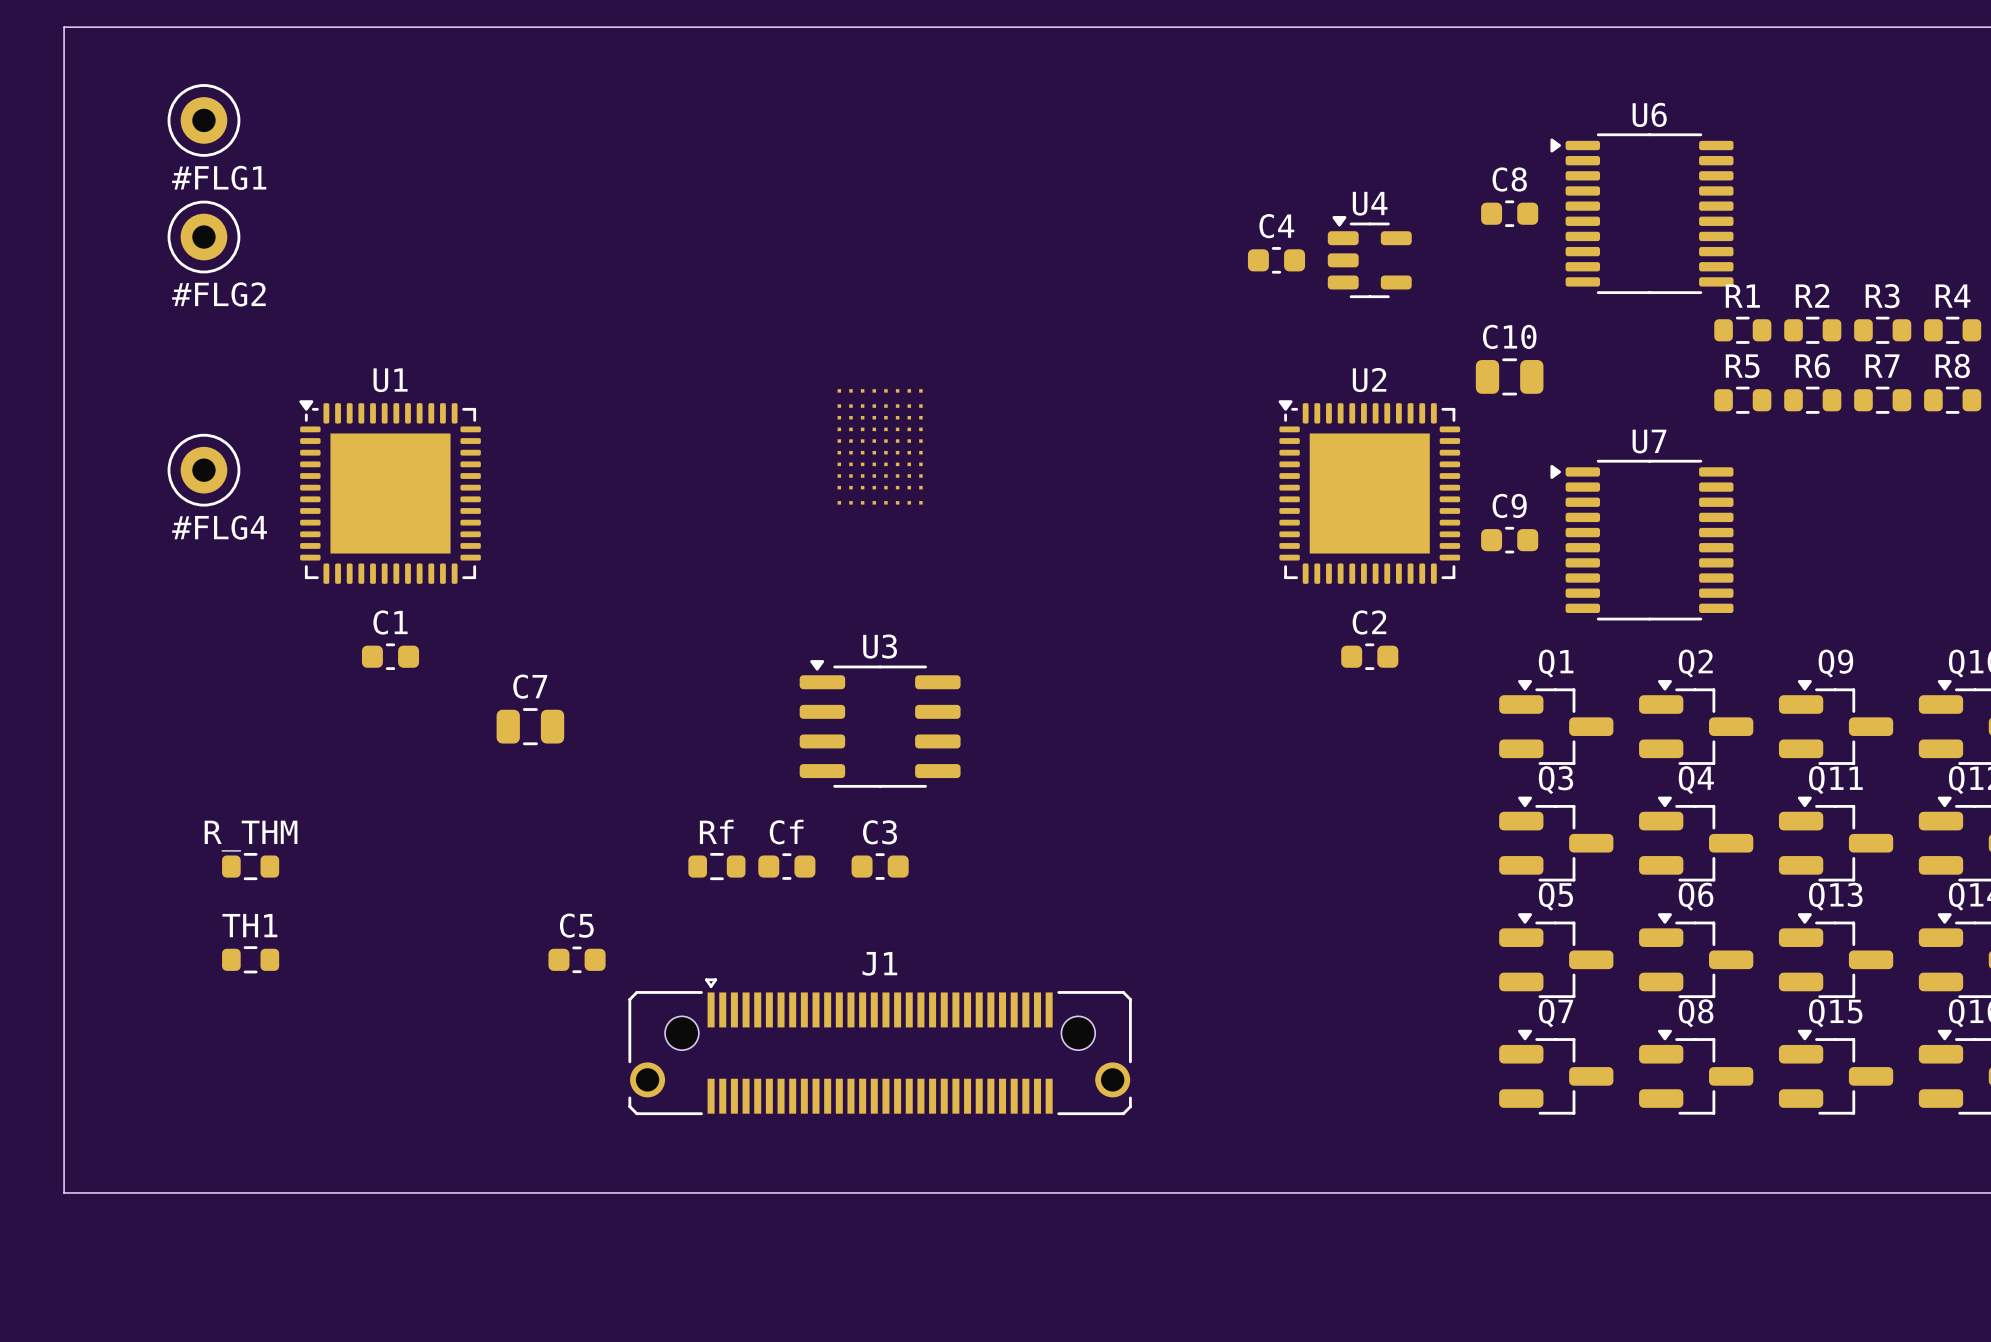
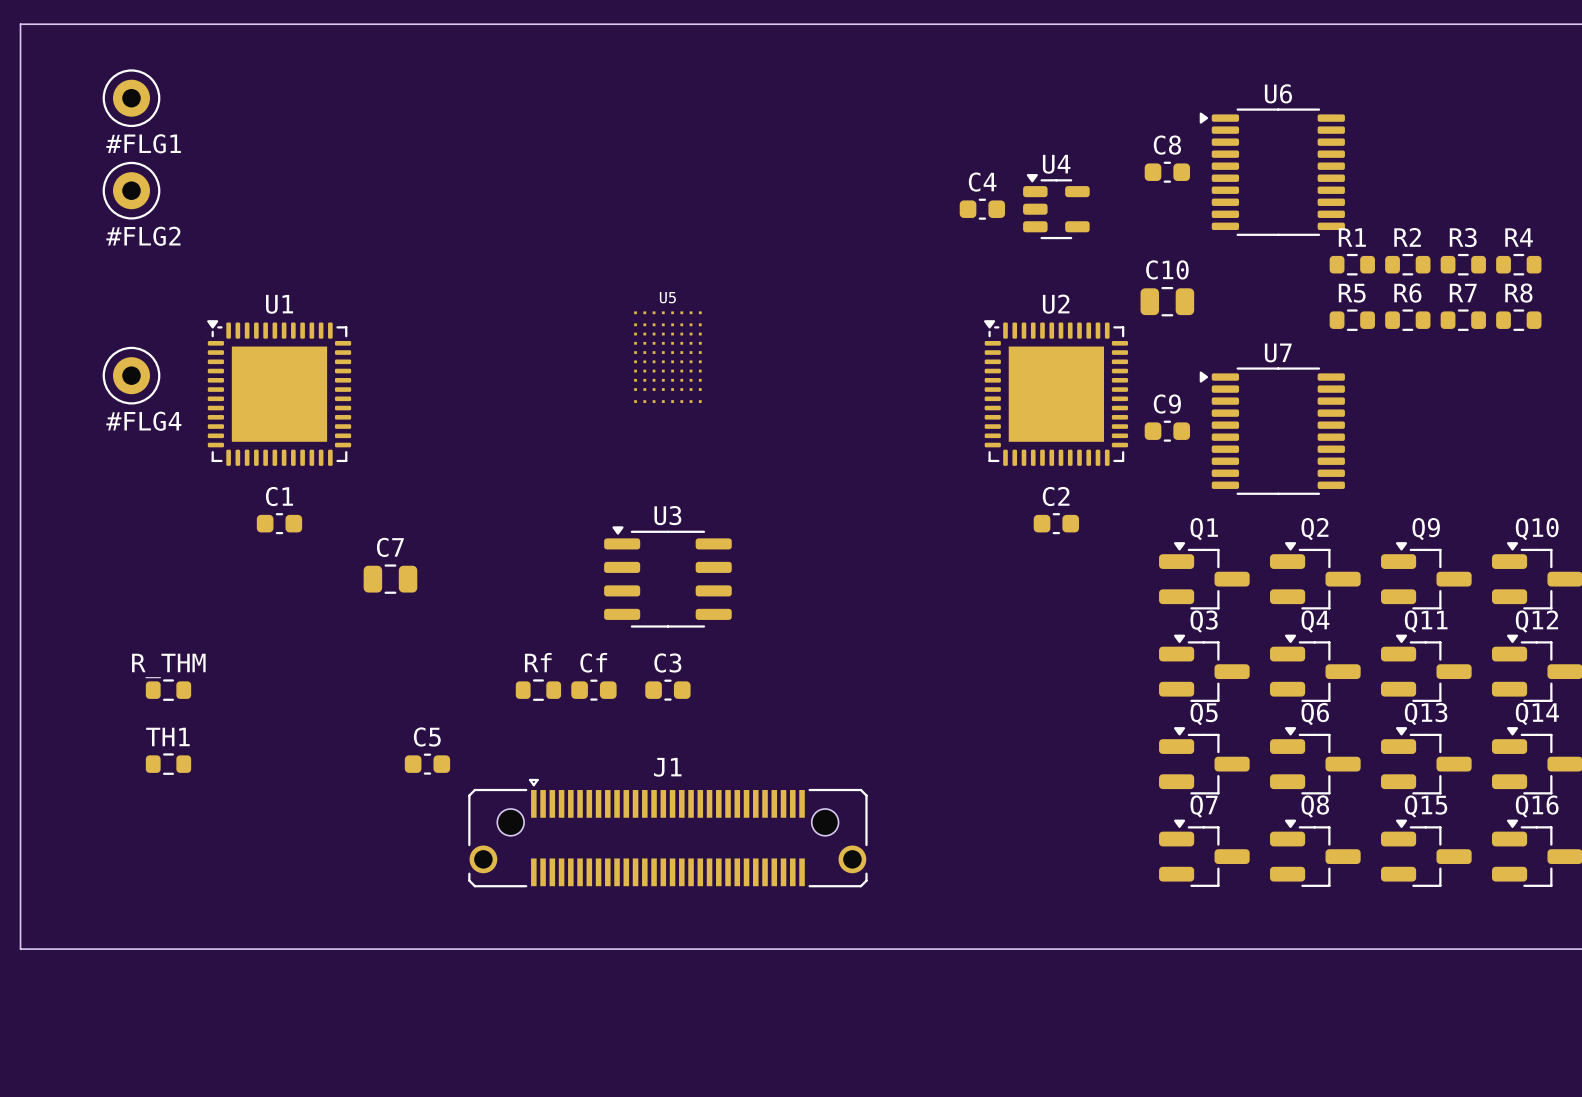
U5 name: none -> U5 (667, 297)

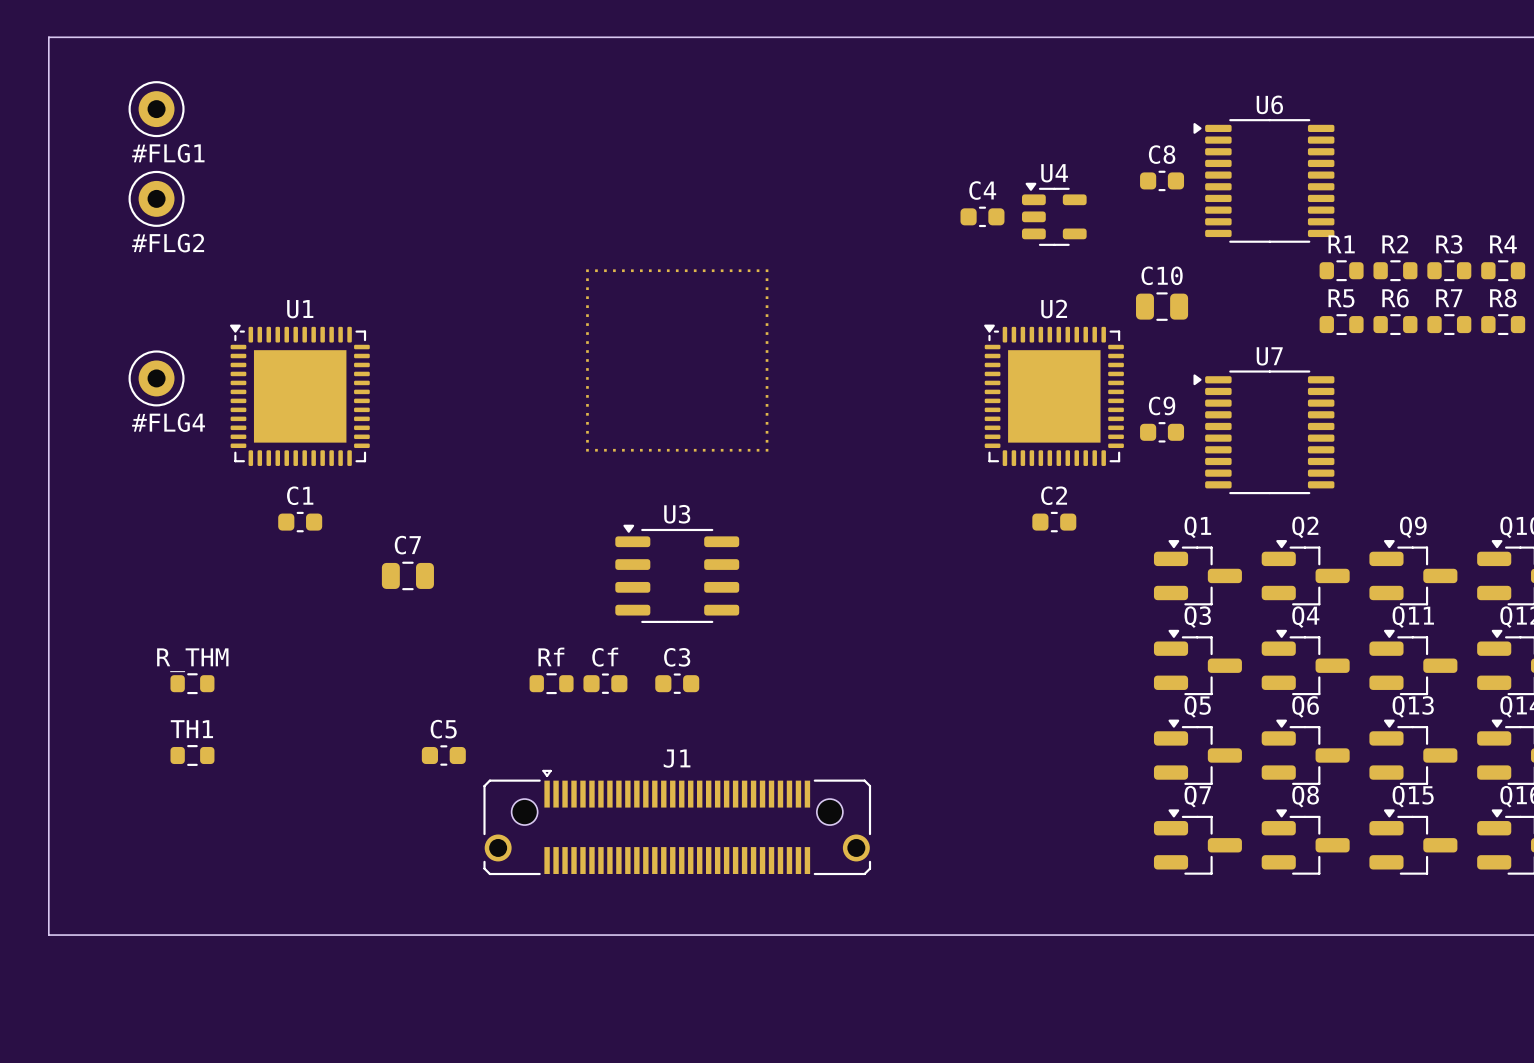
U5: (667, 357) -> none
part: none -> (677, 360)

